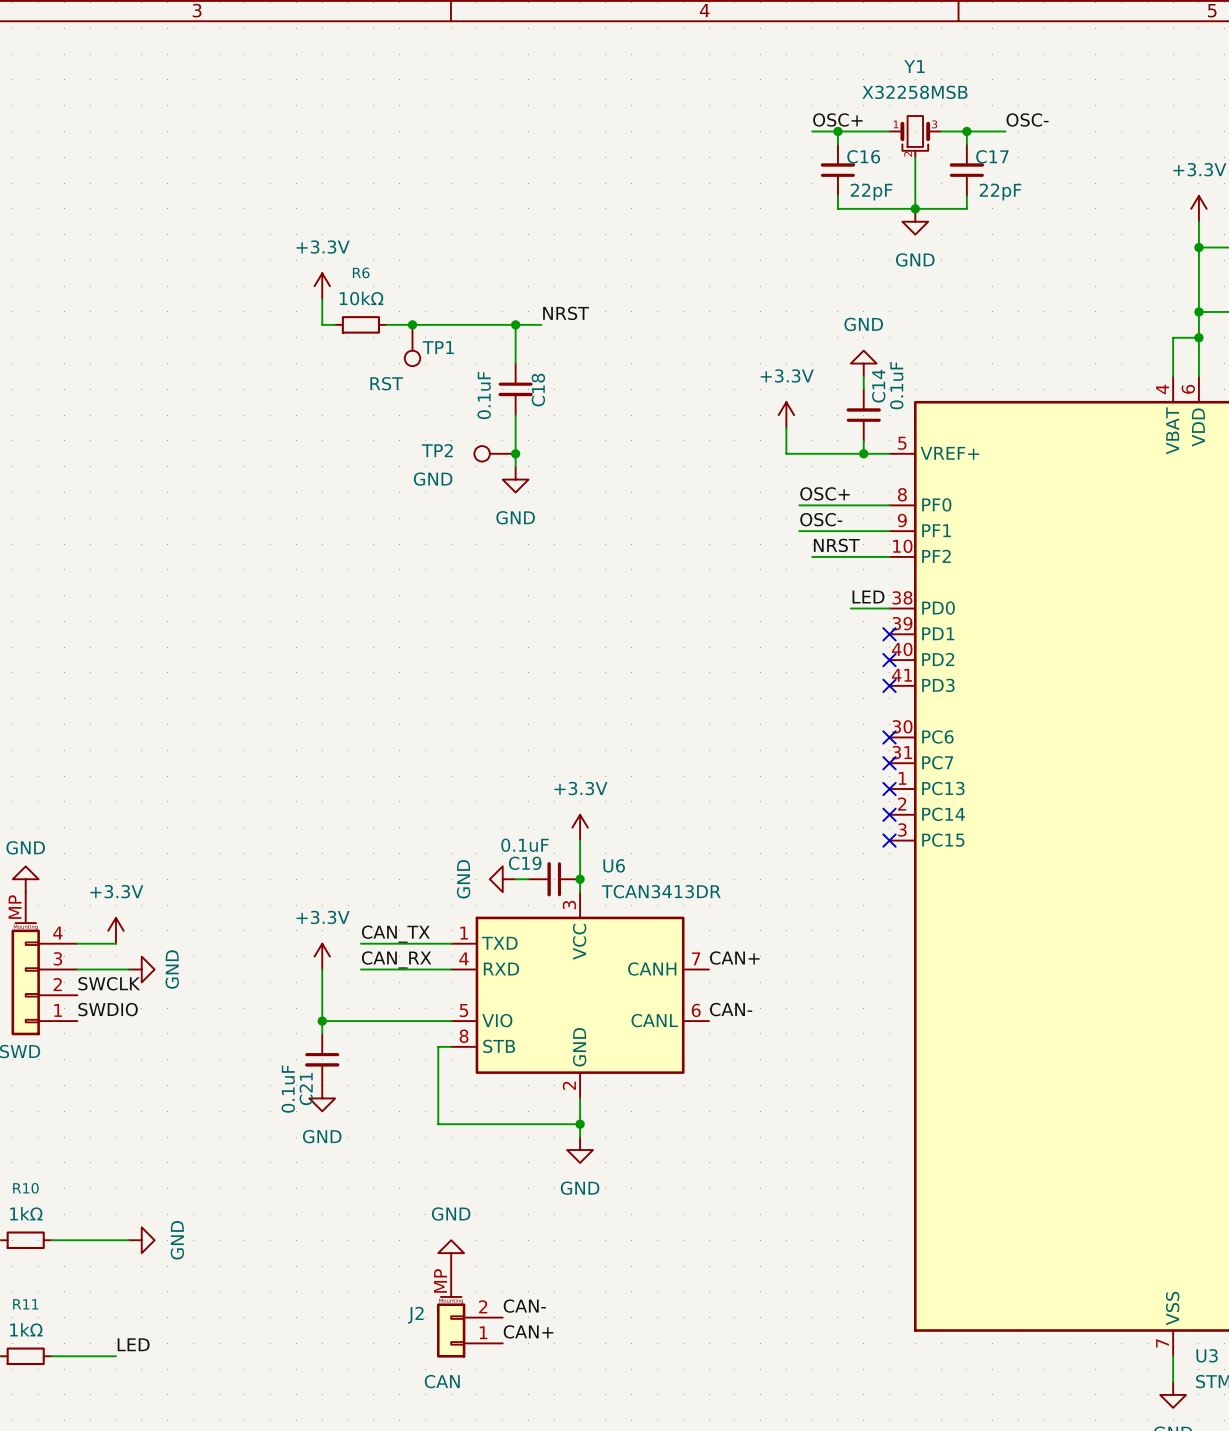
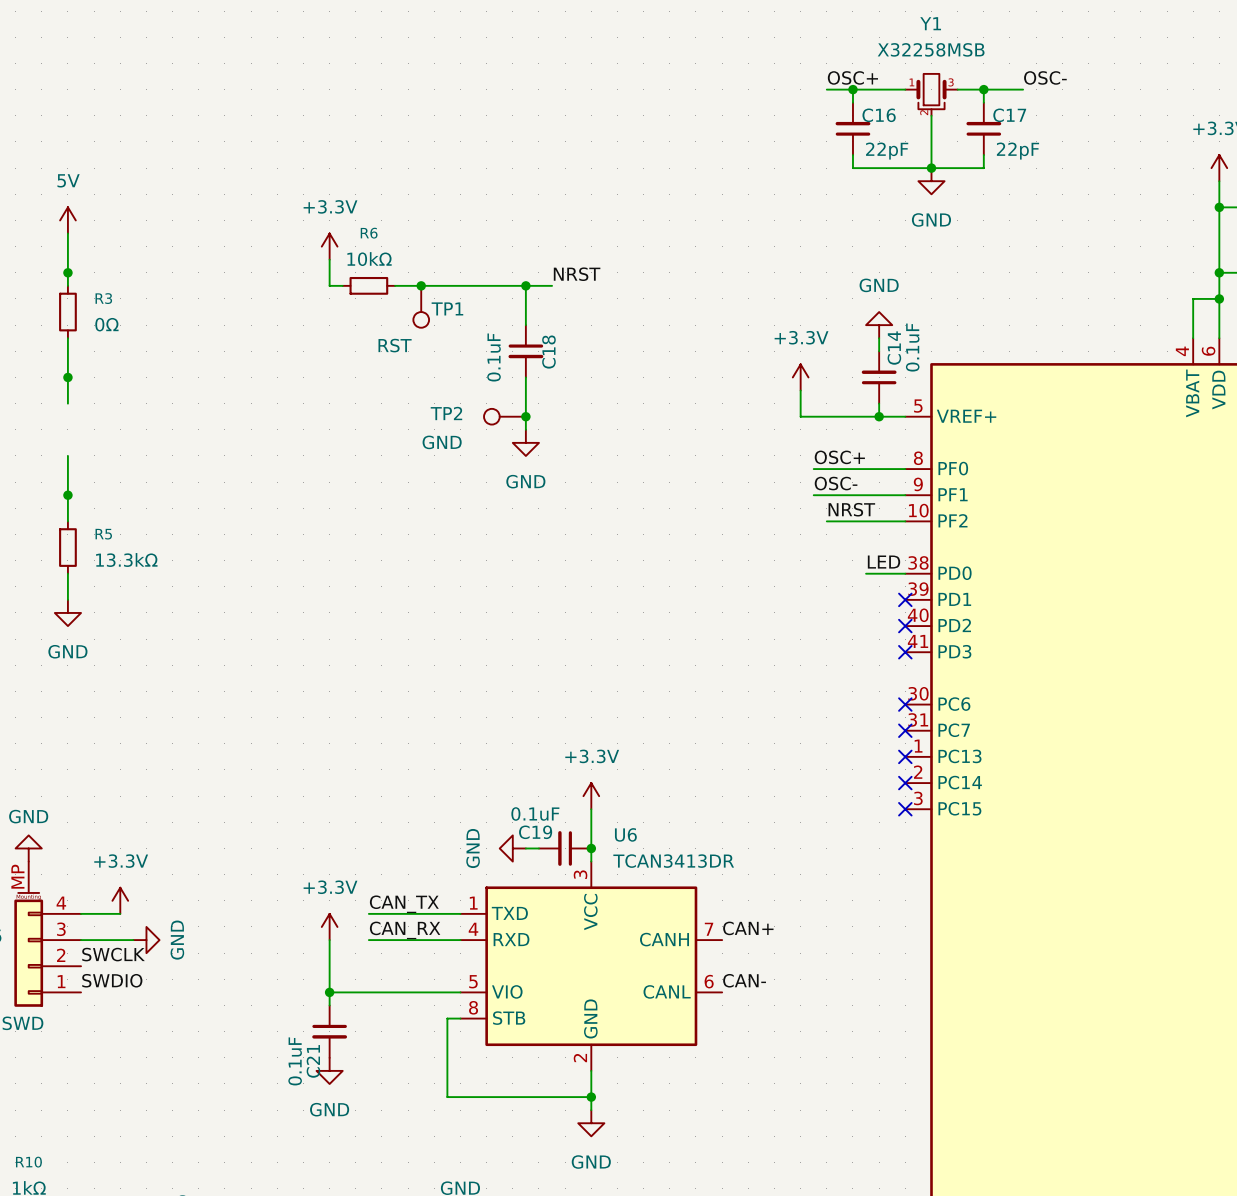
power symbol: none -> 5V (67, 220)
wire: none -> (67, 233) (67, 285)
junction: none -> (67, 272)
R3: none -> 0Ω (67, 312)
wire: none -> (67, 338) (67, 403)
junction: none -> (67, 377)
wire: none -> (67, 455) (67, 521)
junction: none -> (67, 495)
R5: none -> 13.3kΩ (67, 547)
wire: none -> (67, 573) (67, 599)
power symbol: none -> GND (67, 612)

